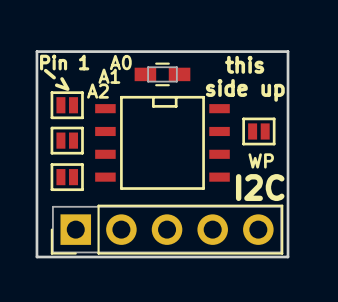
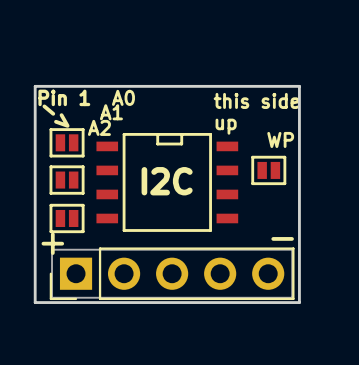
text: this (244, 64) -> this side (256, 100)
part: (162, 74) -> none
text: none -> up (226, 126)
text: side up (245, 90) -> none
part value position: WP (261, 160) -> WP (280, 139)
text position: I2C (260, 187) -> I2C (167, 181)
text: none -> - (282, 238)
text: none -> + (52, 243)

